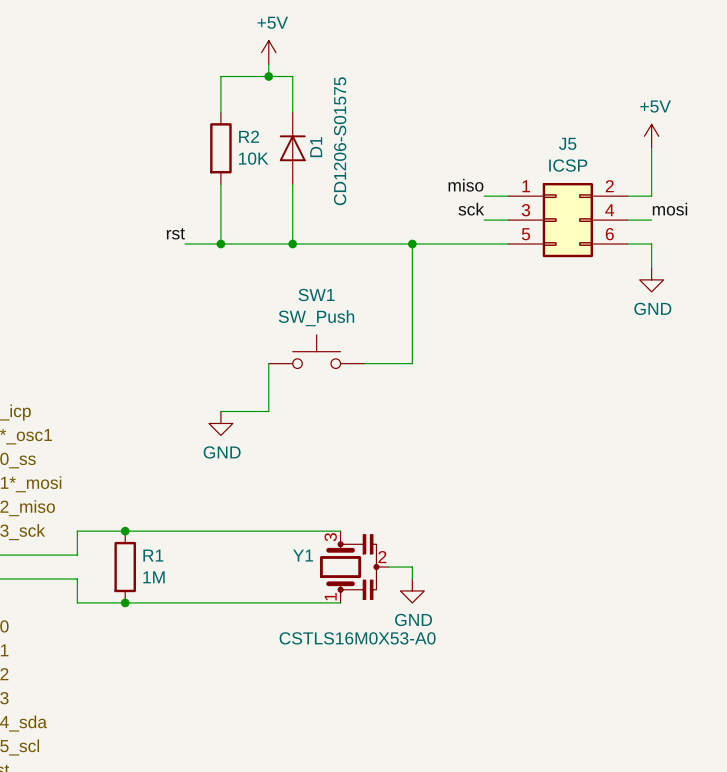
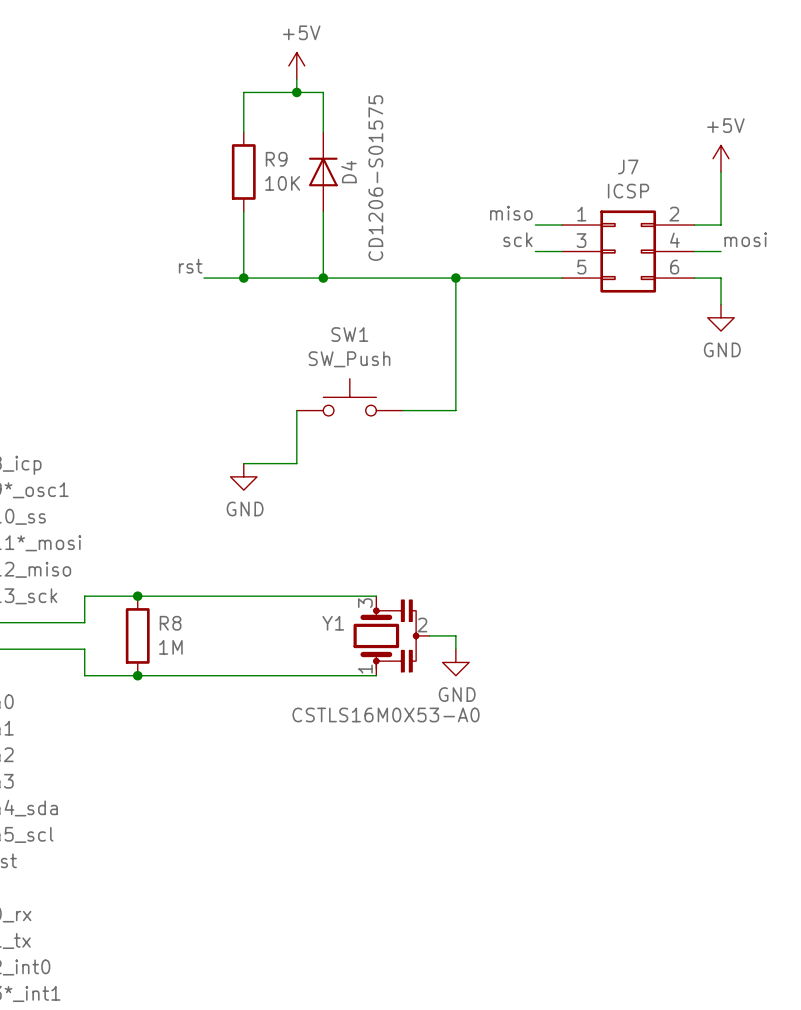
R2 name: R2 (249, 136) -> R9 (276, 159)
J5 name: J5 (567, 143) -> J7 (628, 166)
D1 name: D1 (316, 147) -> D4 (349, 172)
R1 name: R1 (153, 555) -> R8 (170, 623)

